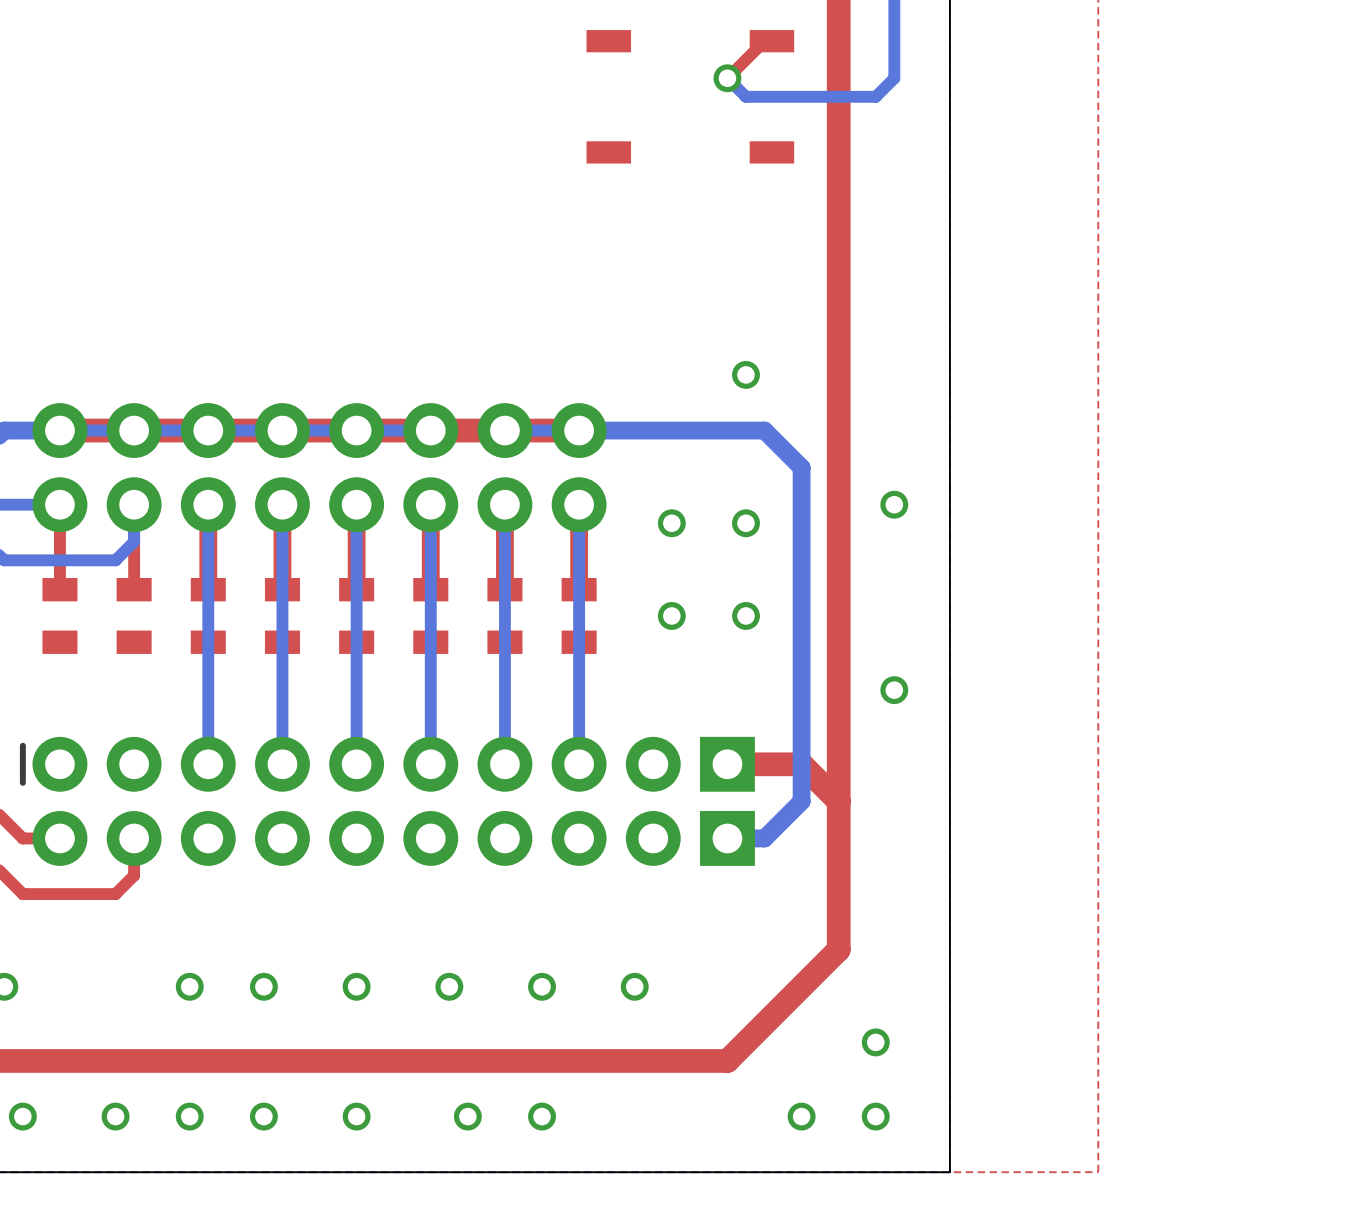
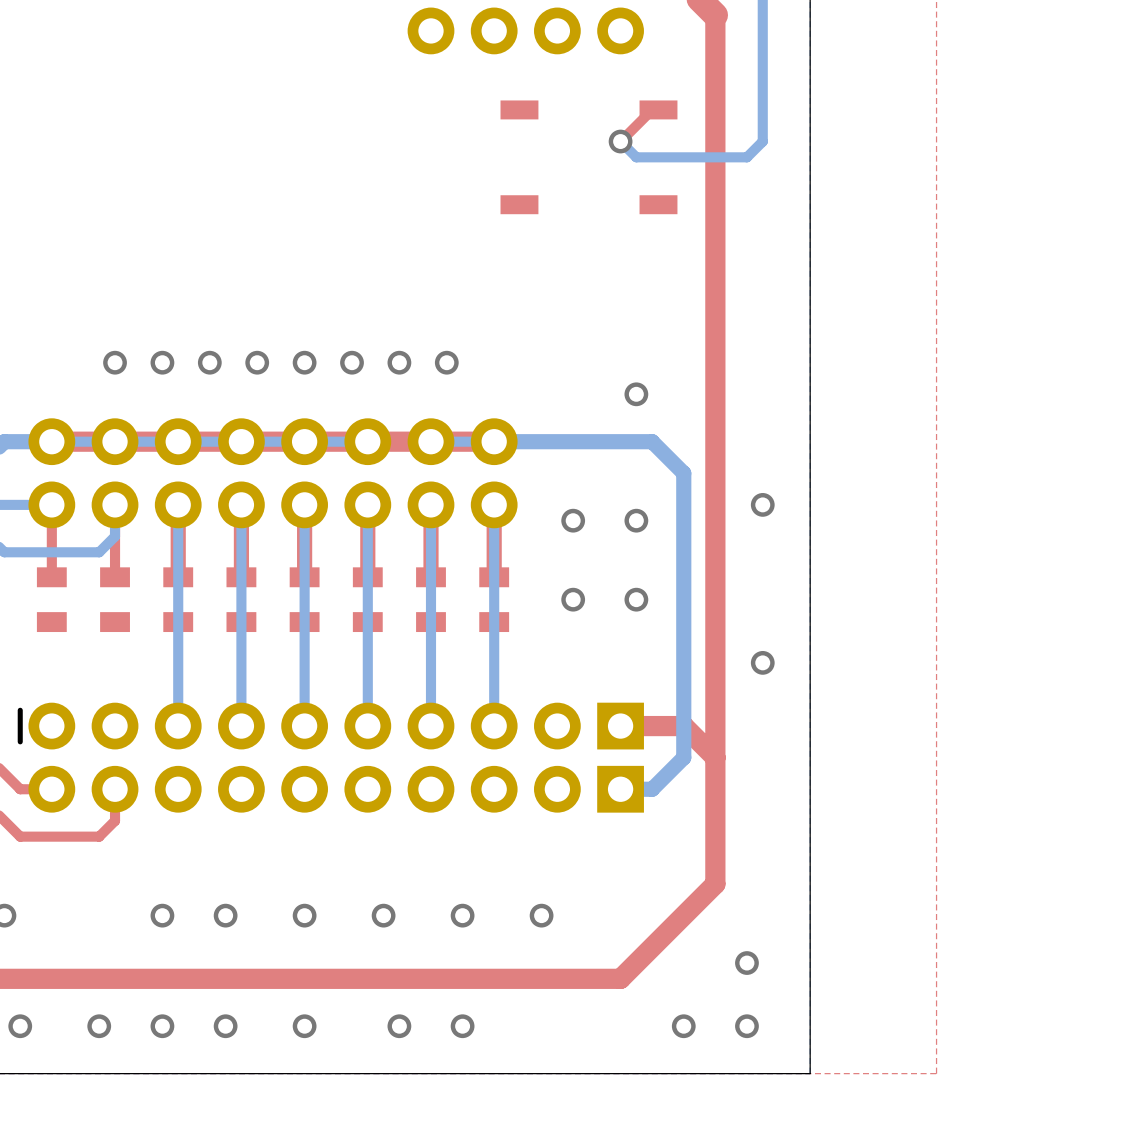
via: none -> (115, 362)
via: none -> (162, 362)
via: none -> (209, 362)
via: none -> (257, 362)
via: none -> (304, 362)
via: none -> (352, 362)
via: none -> (399, 362)
via: none -> (446, 362)

